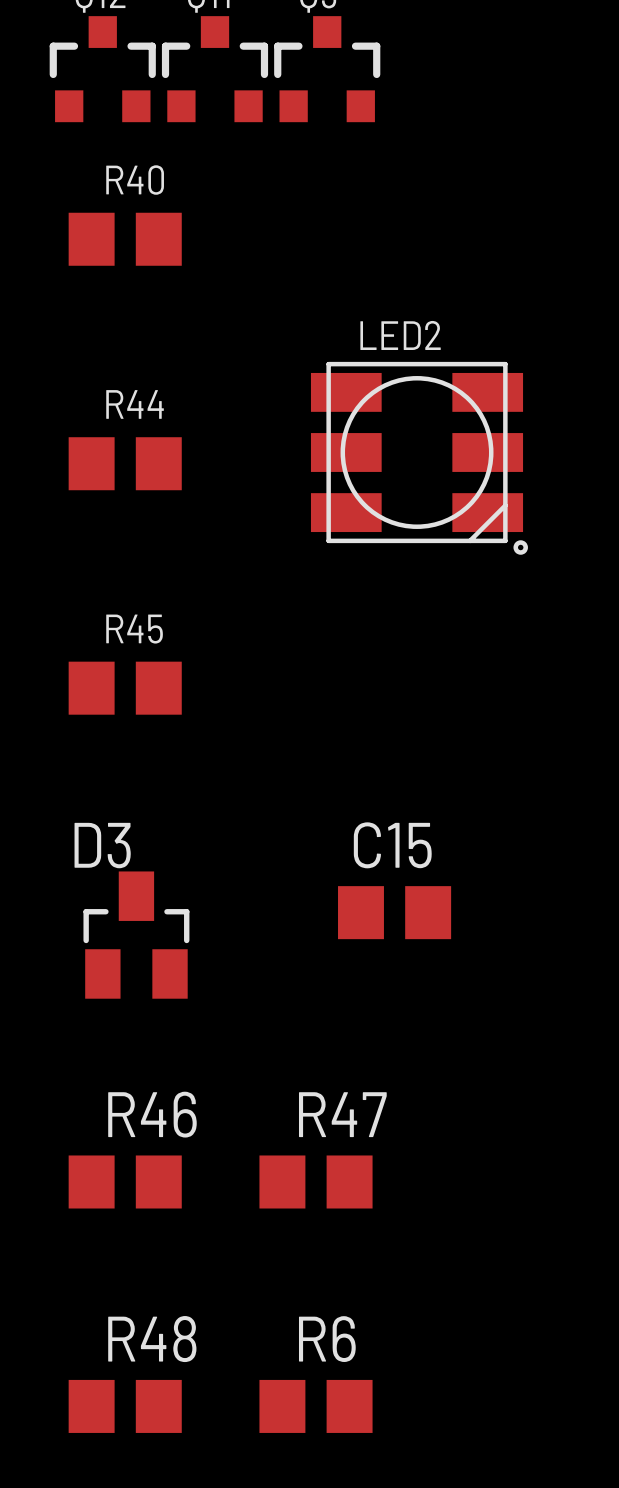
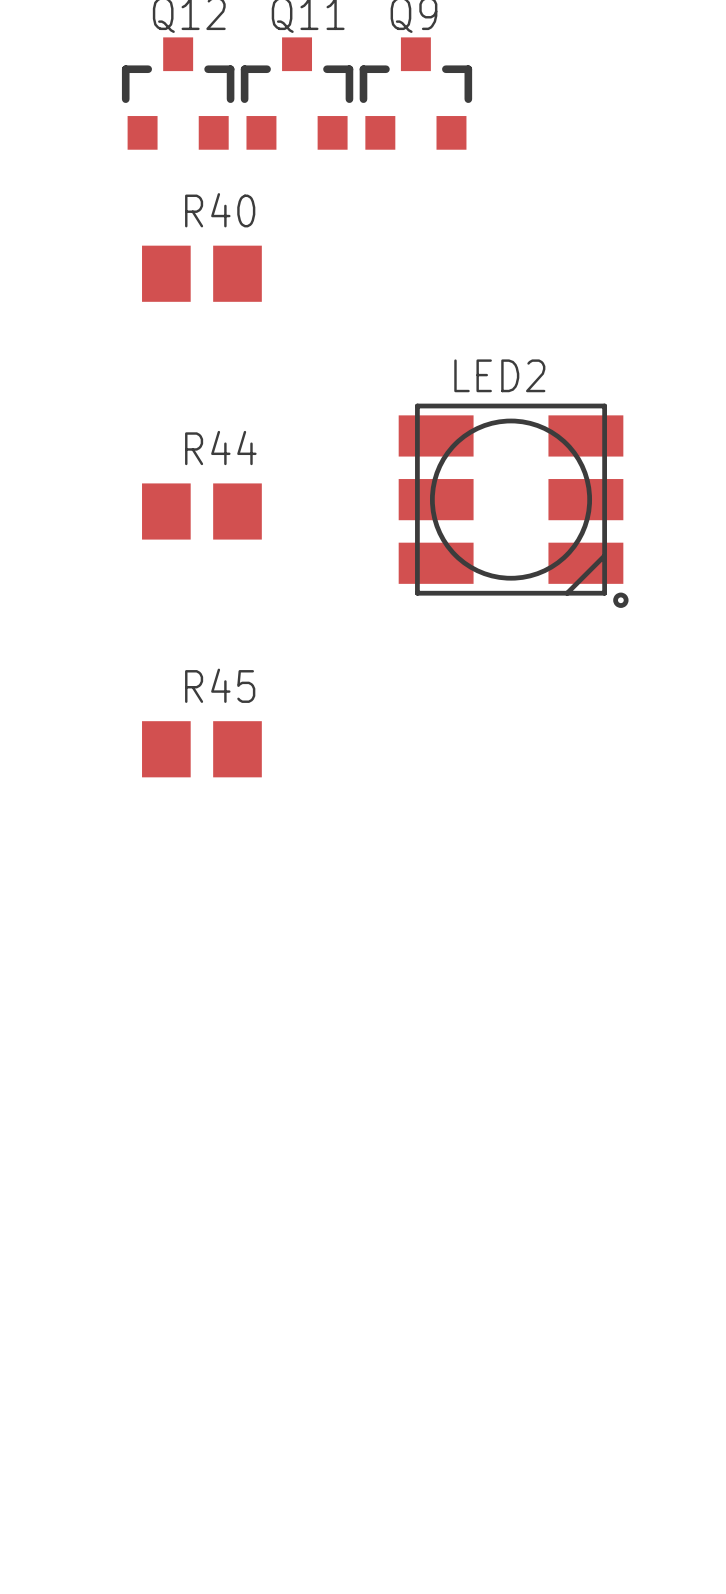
C15: (394, 912) -> none
D3: (136, 935) -> none
R46: (125, 1181) -> none
R47: (316, 1181) -> none
R48: (125, 1406) -> none
R6: (316, 1406) -> none

